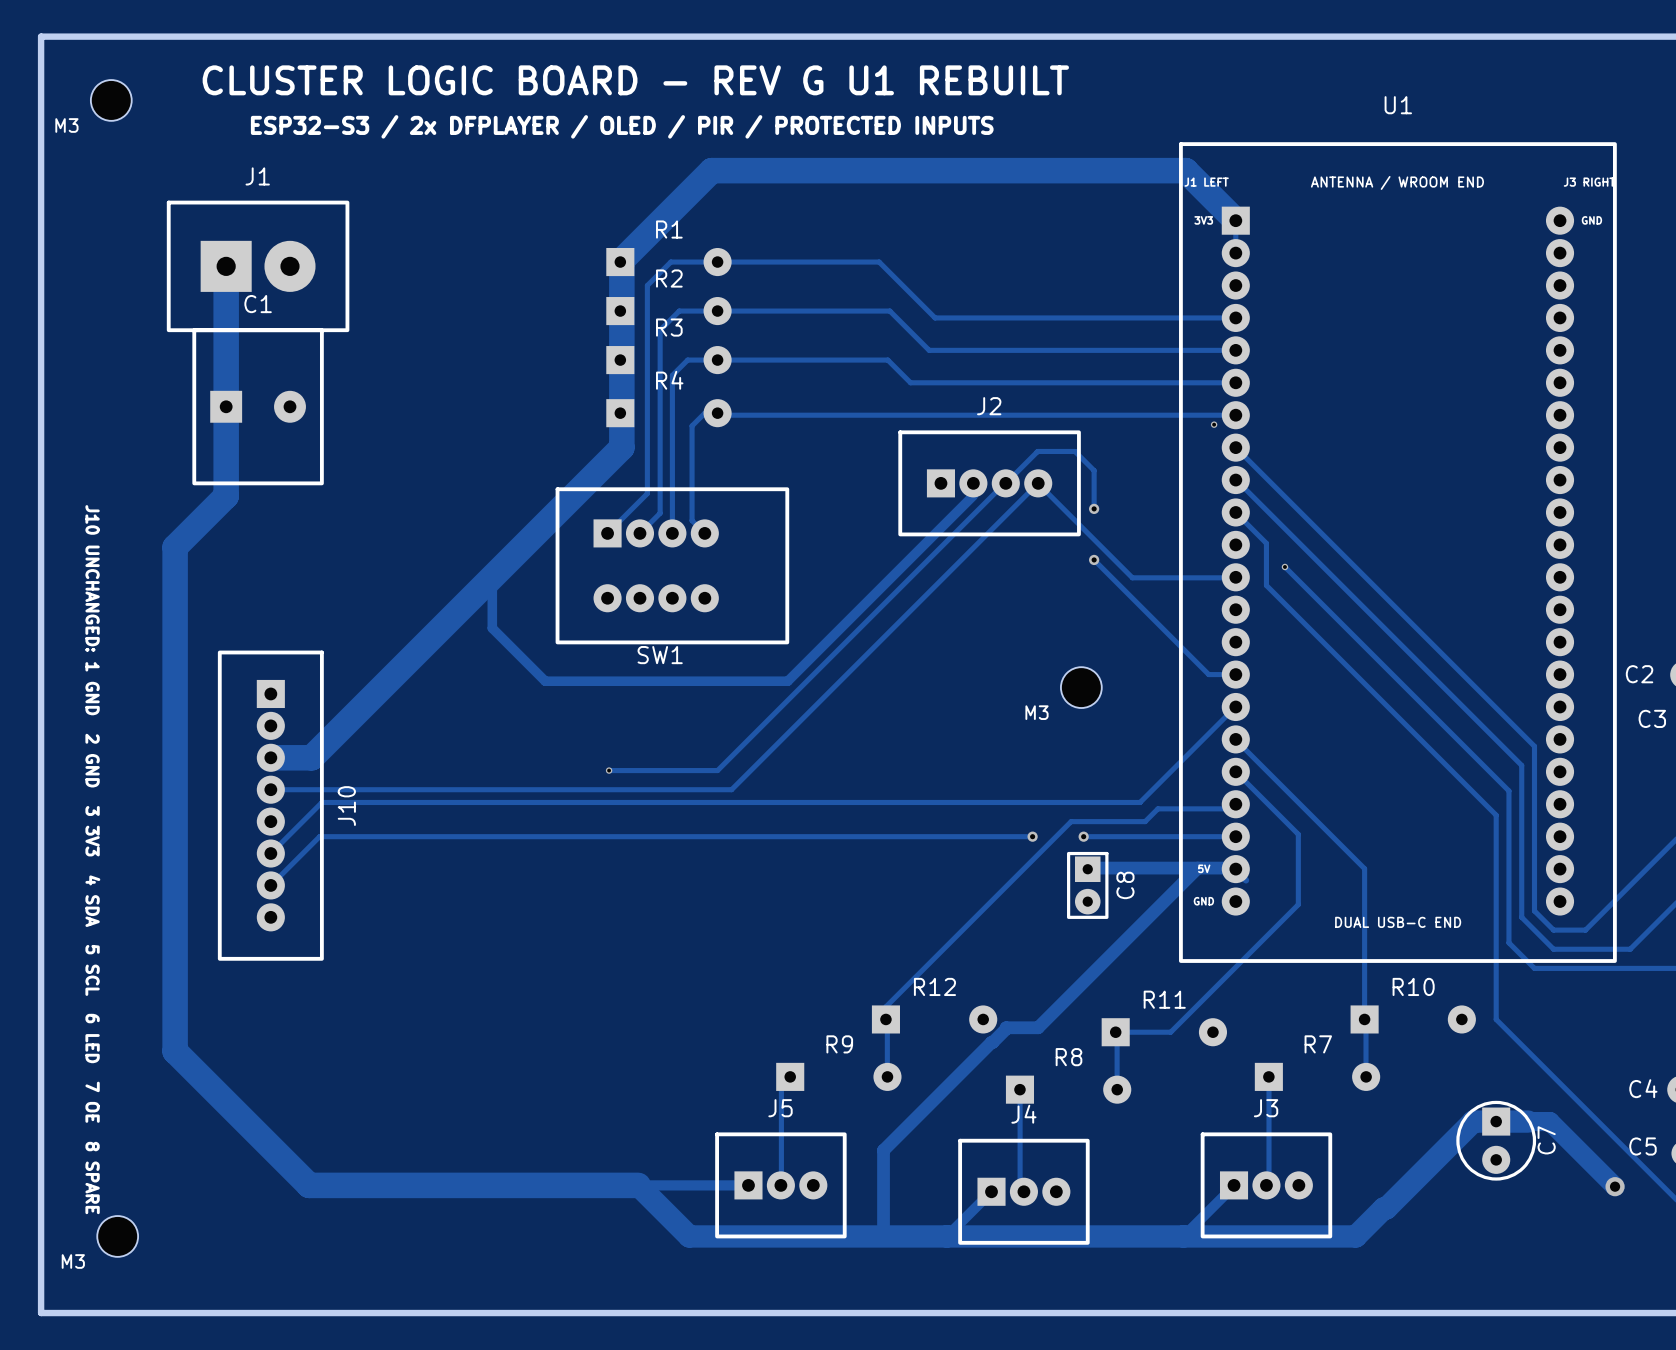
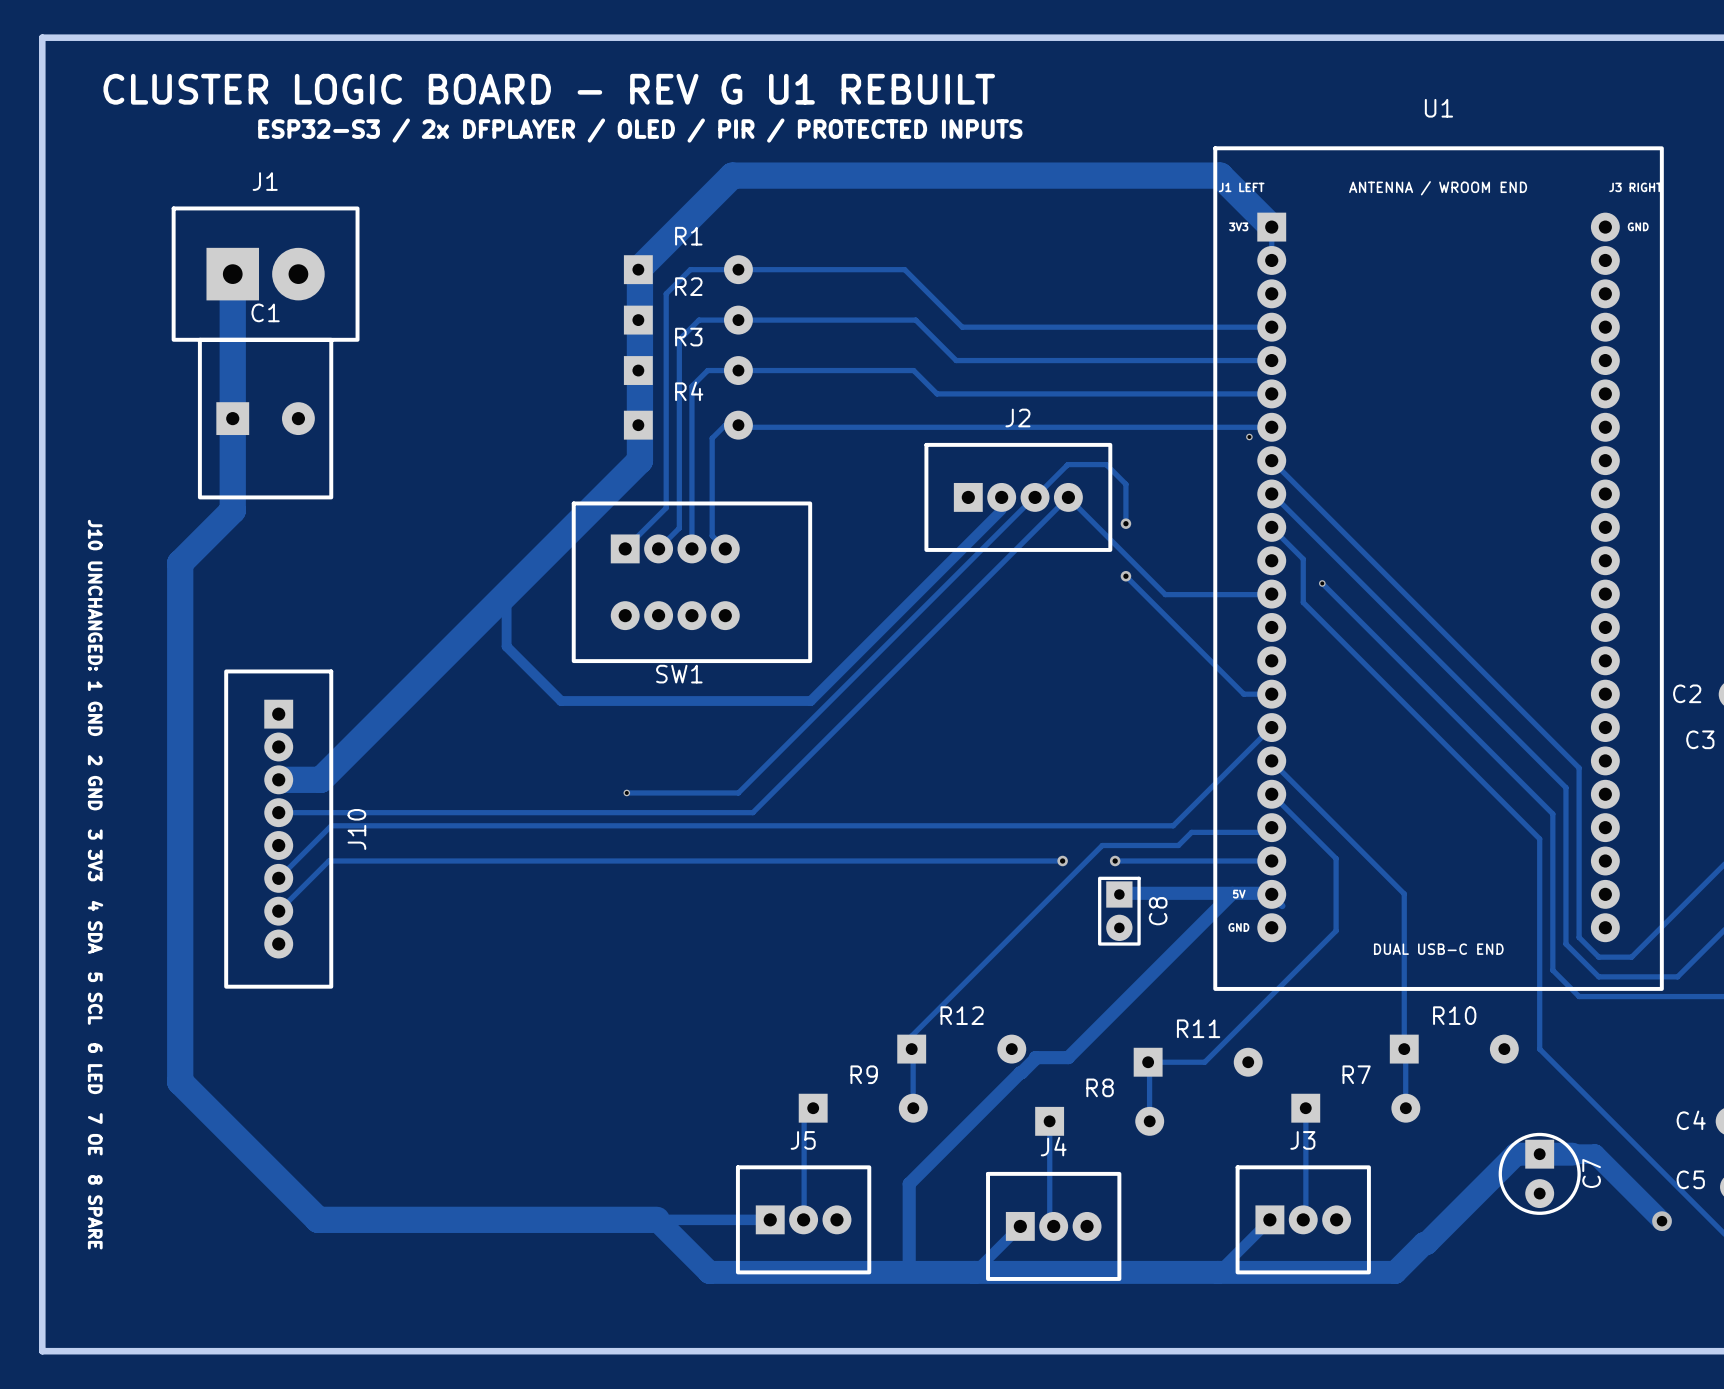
text position: CLUSTER LOGIC BOARD - REV G U1 REBUILT (635, 80) -> CLUSTER LOGIC BOARD - REV G U1 REBUILT (549, 89)
M3: (111, 100) -> none
M3: (1081, 687) -> none
M3: (117, 1236) -> none

